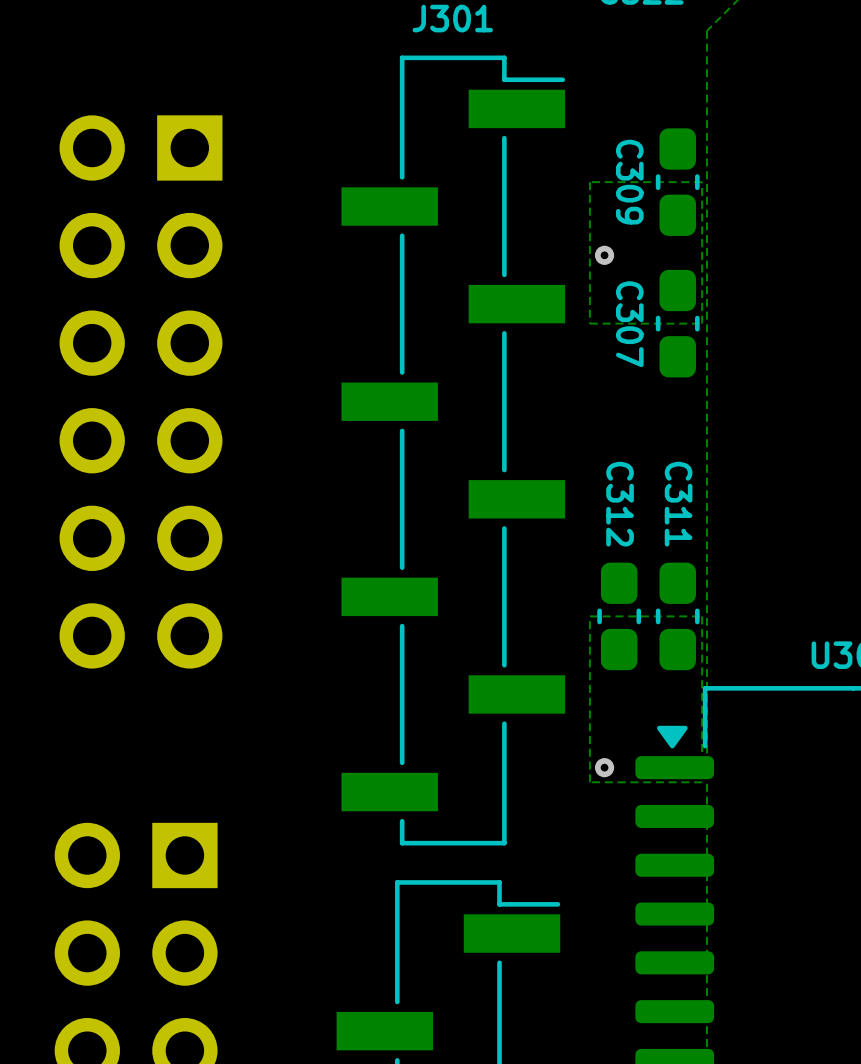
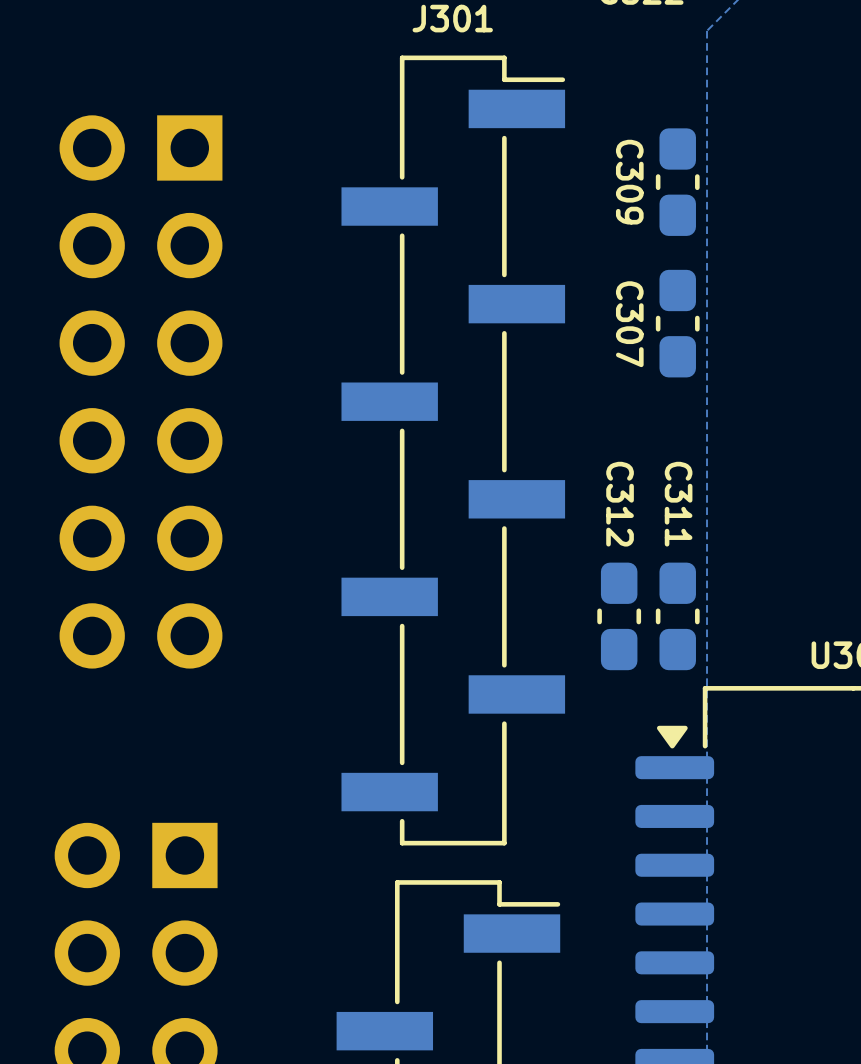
zone outline: (702, 182) (589, 182) (589, 323) (702, 323) (702, 182) -> none
via: (604, 255) -> none
zone outline: (702, 616) (702, 782) (589, 782) (589, 616) (702, 616) -> none
via: (604, 767) -> none

